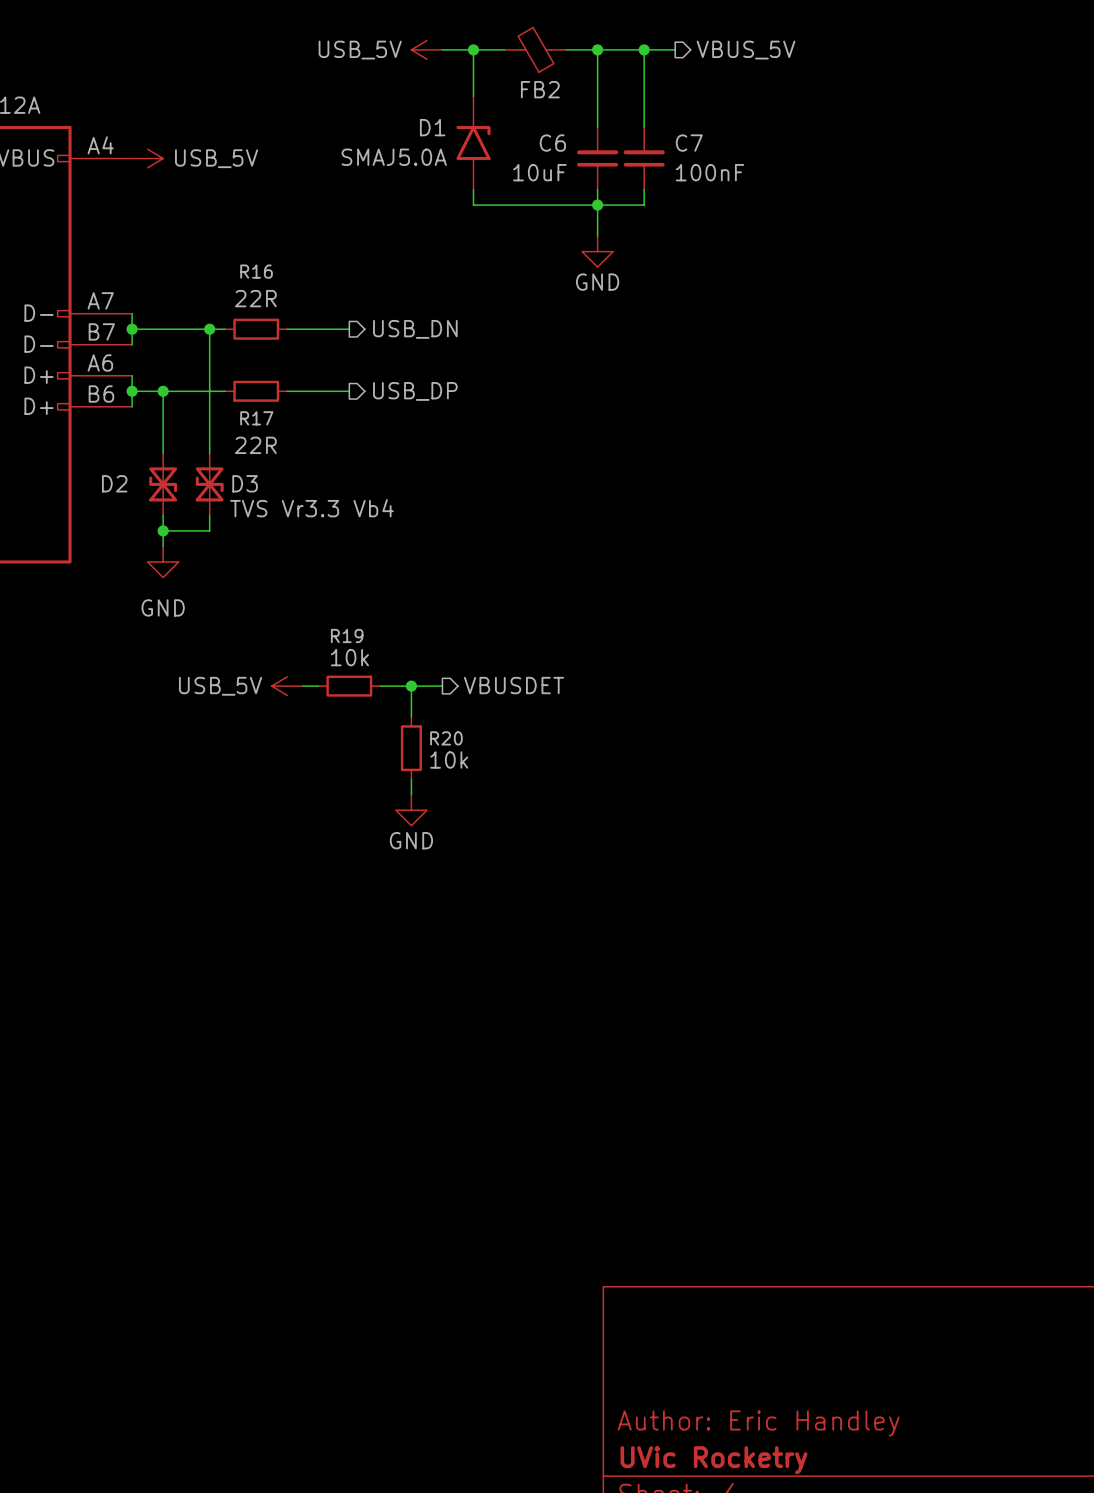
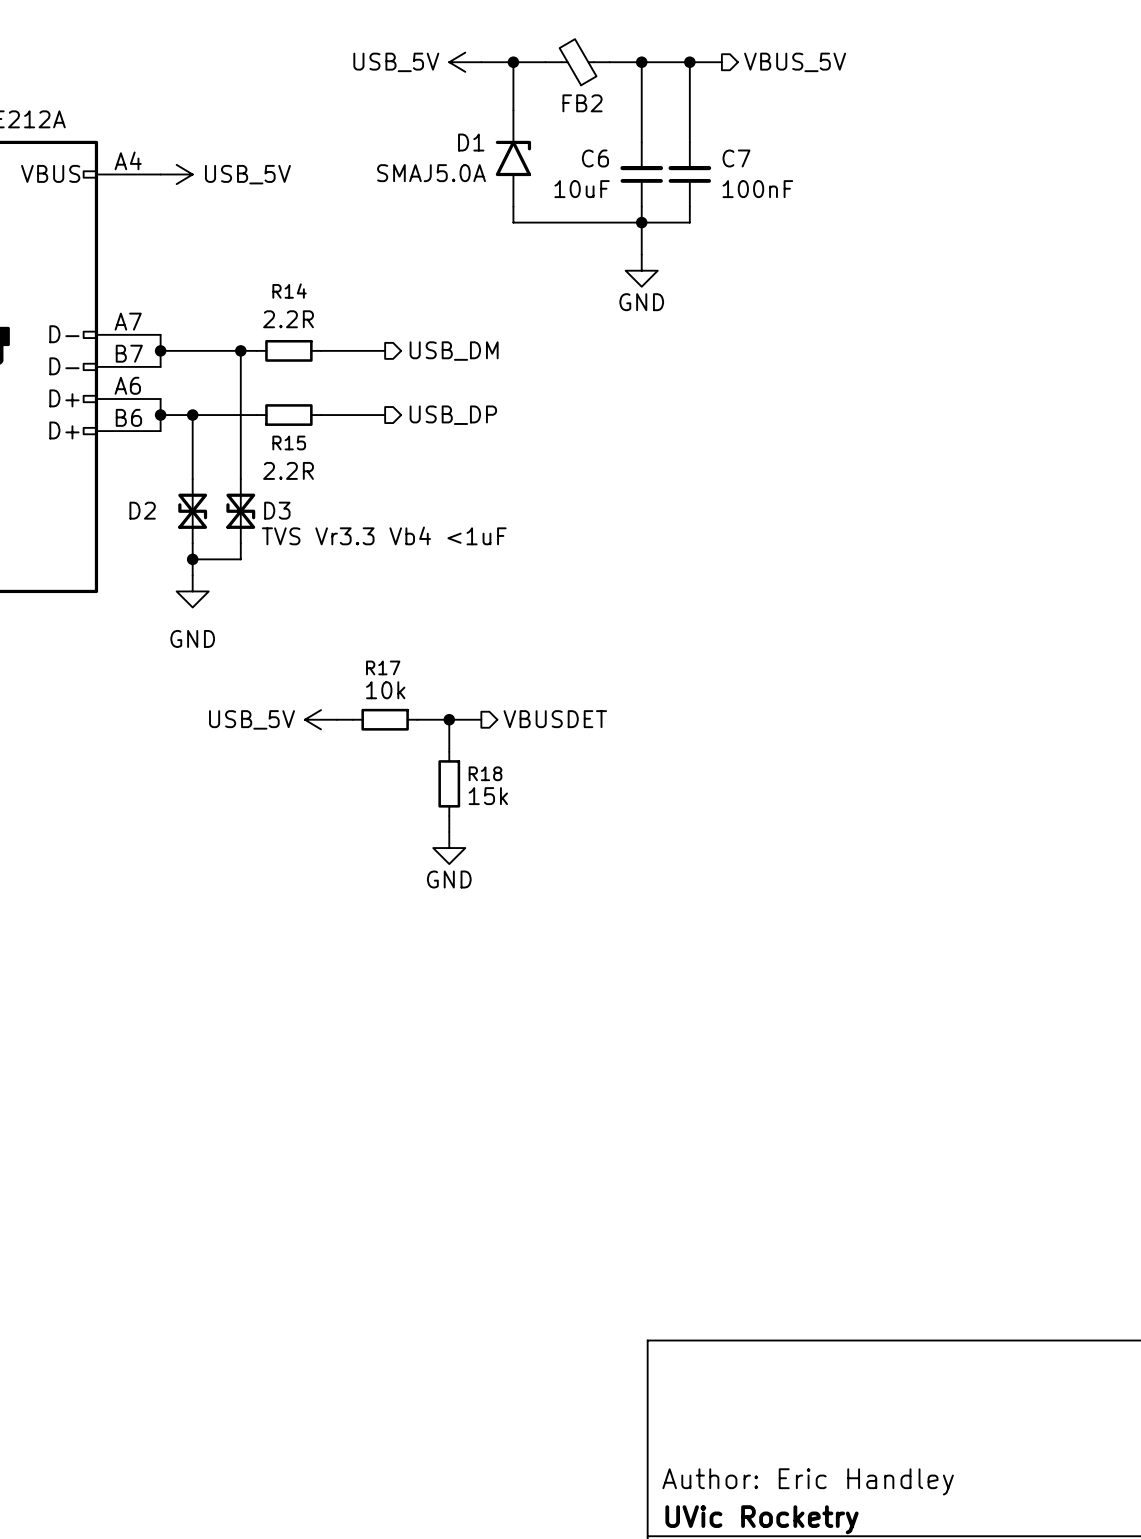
R16 name: R16 (256, 271) -> R14 (289, 291)
R16 value: 22R (255, 298) -> 2.2R (288, 319)
hierarchical label: USB_DN (415, 329) -> USB_DM (454, 351)
R17 name: R17 (256, 418) -> R15 (289, 443)
R17 value: 22R (255, 445) -> 2.2R (288, 470)
D3 value: TVS Vr3.3 Vb4 (311, 508) -> TVS Vr3.3 Vb4 <1uF (384, 535)
R19 name: R19 (347, 635) -> R17 (383, 667)
R20 name: R20 (446, 738) -> R18 (485, 773)
R20 value: 10k (449, 760) -> 15k (488, 796)

